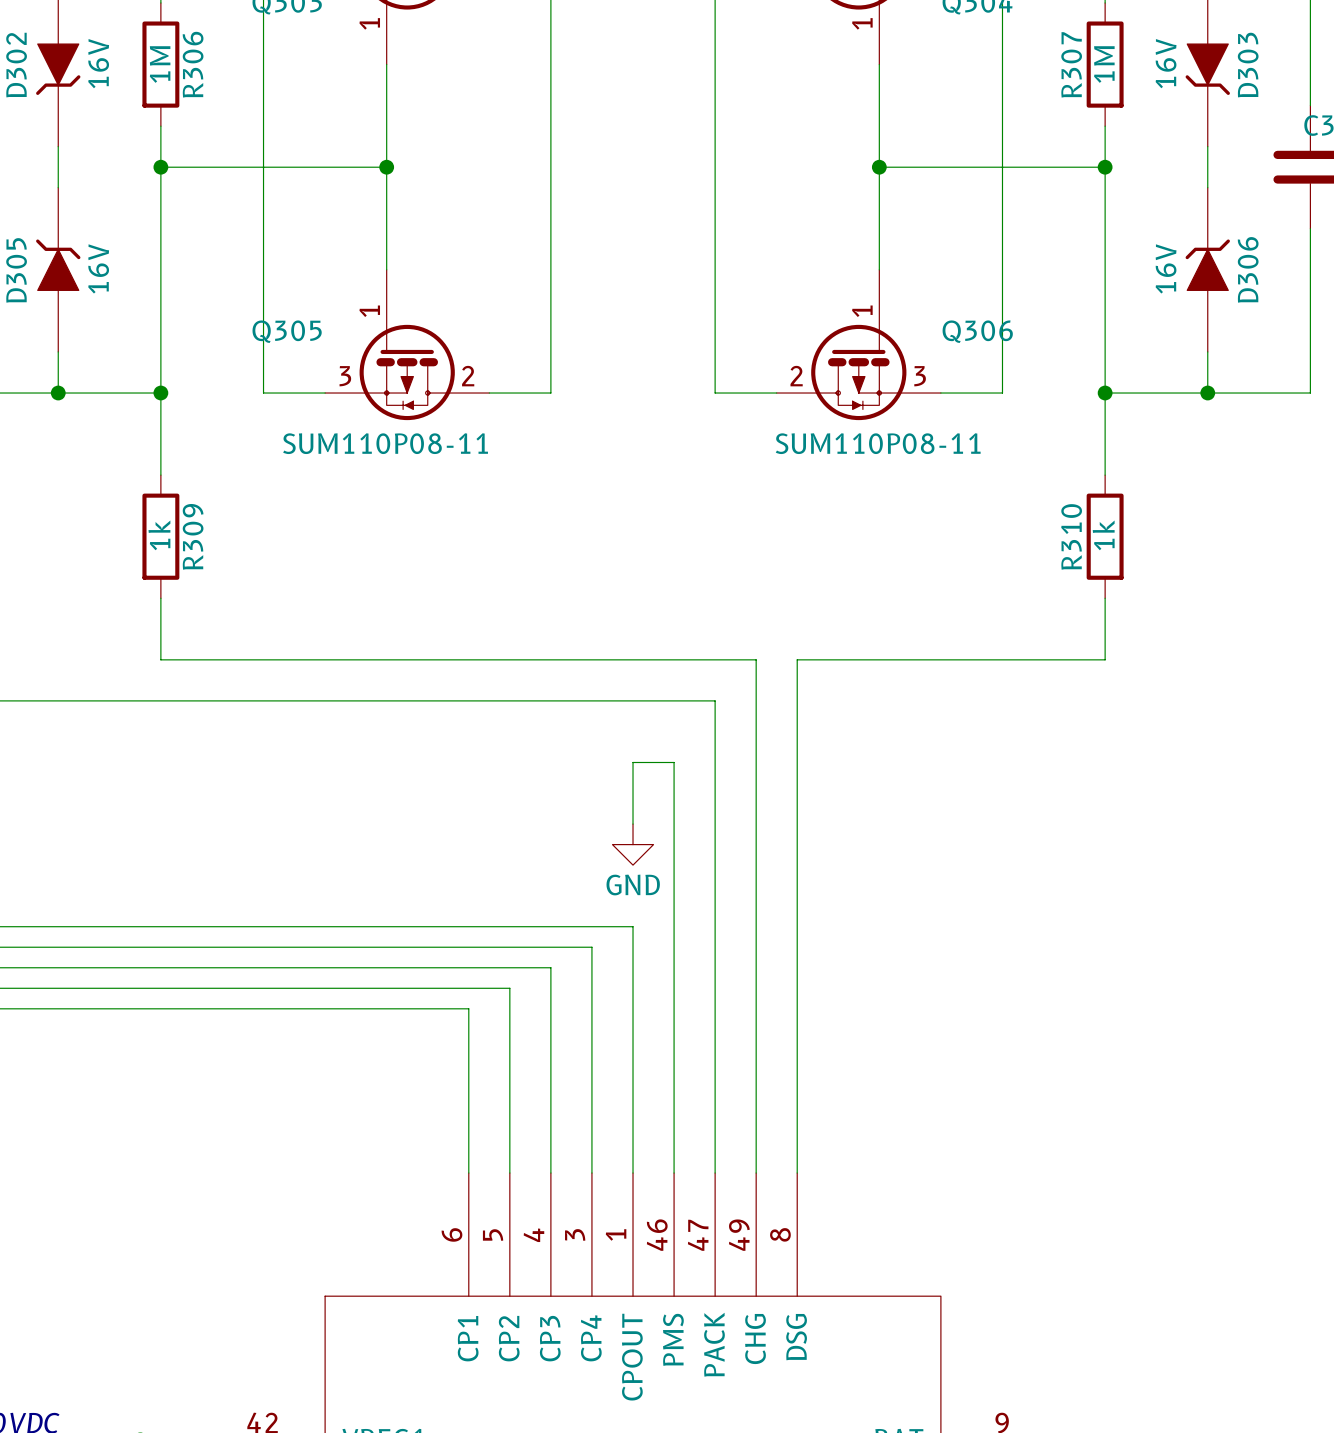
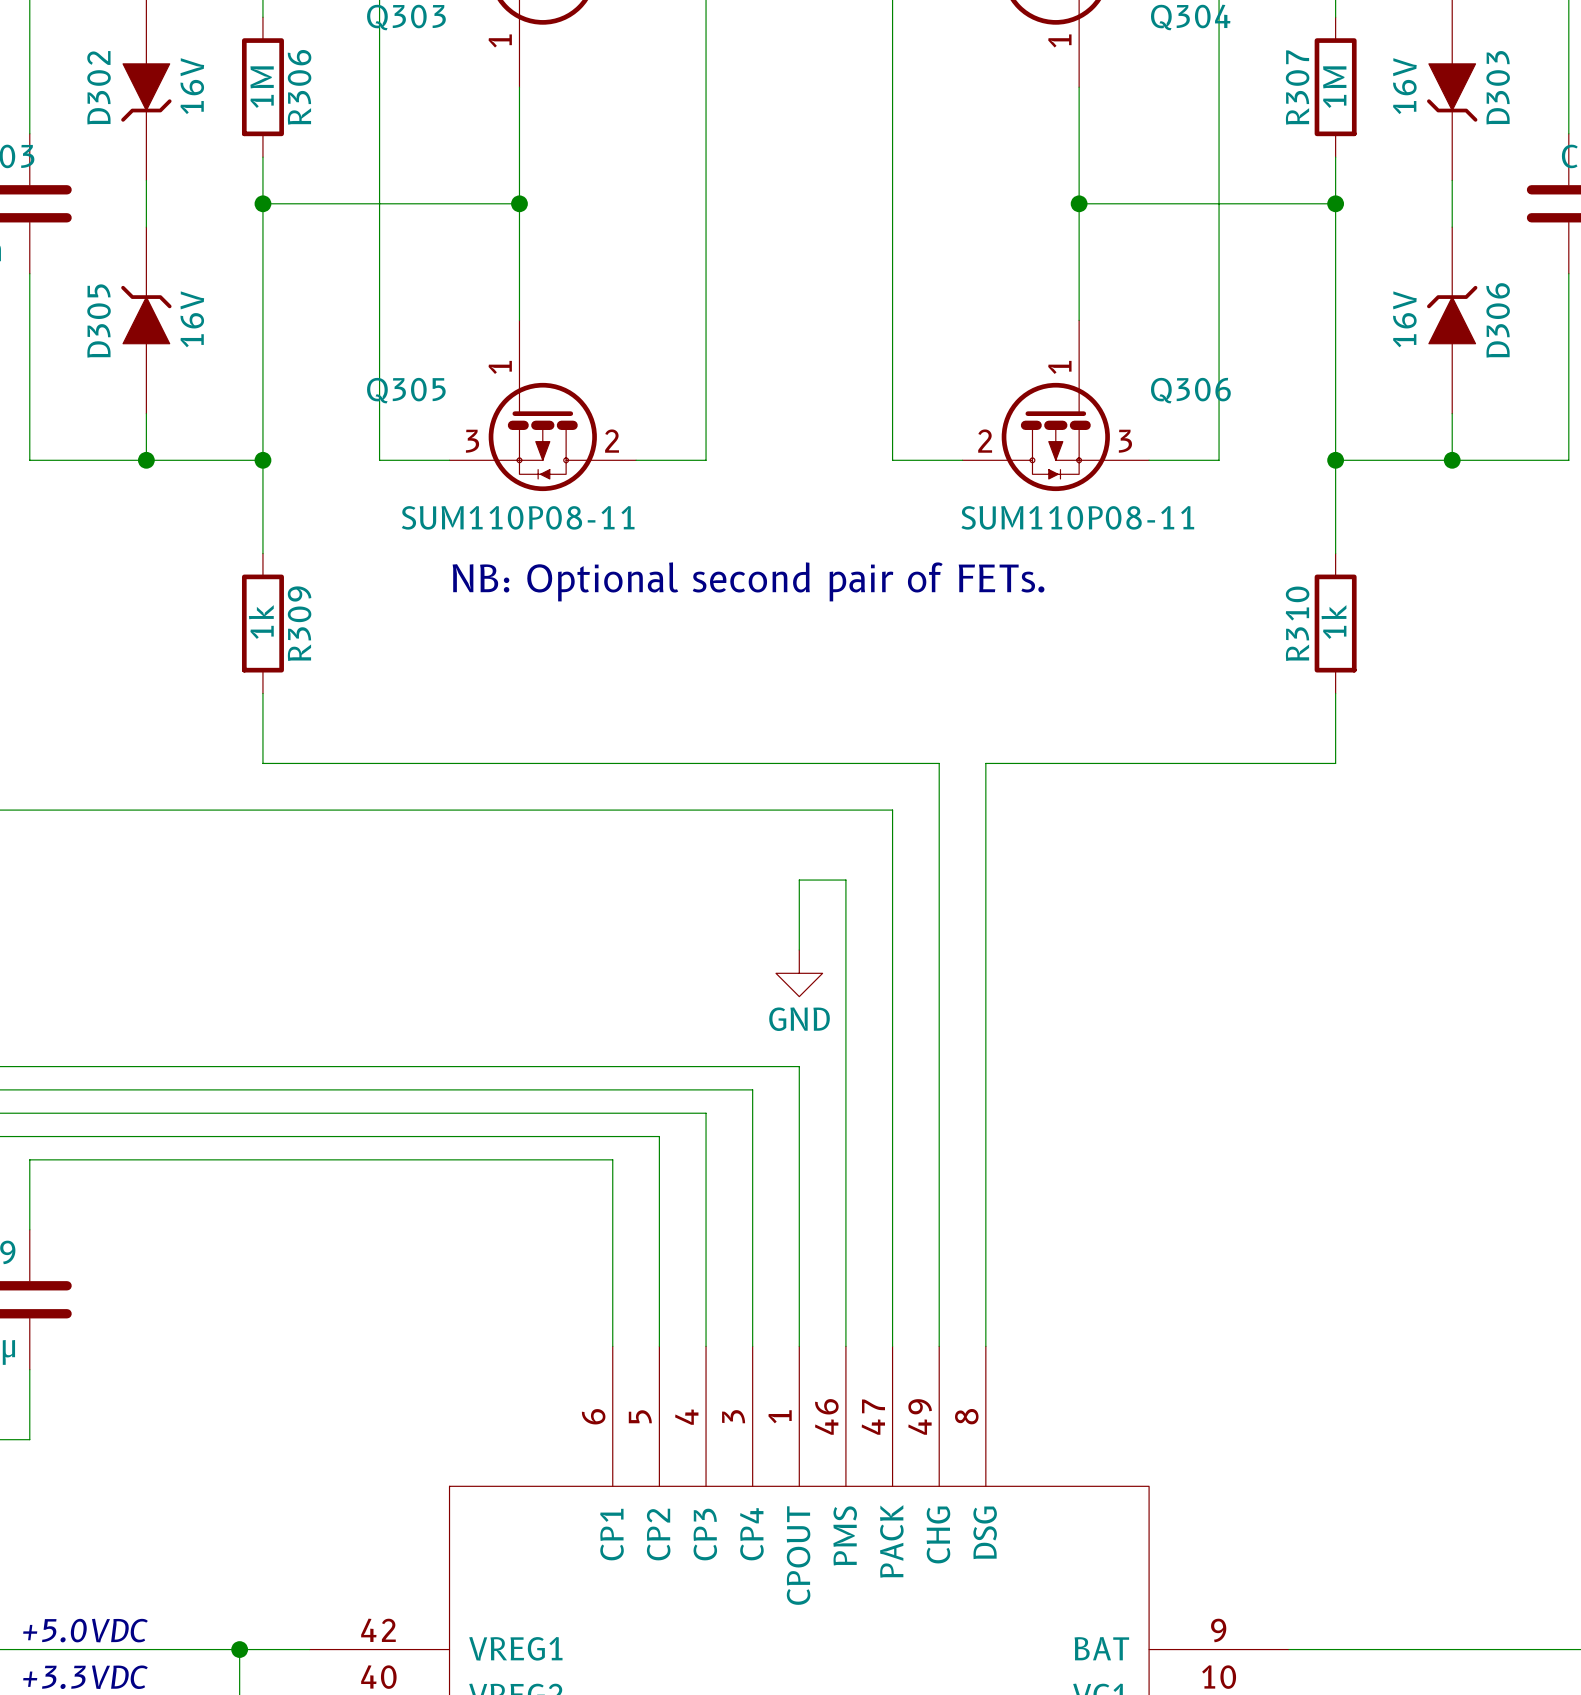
text: none -> NB: Optional second pair of FETs. (748, 581)

